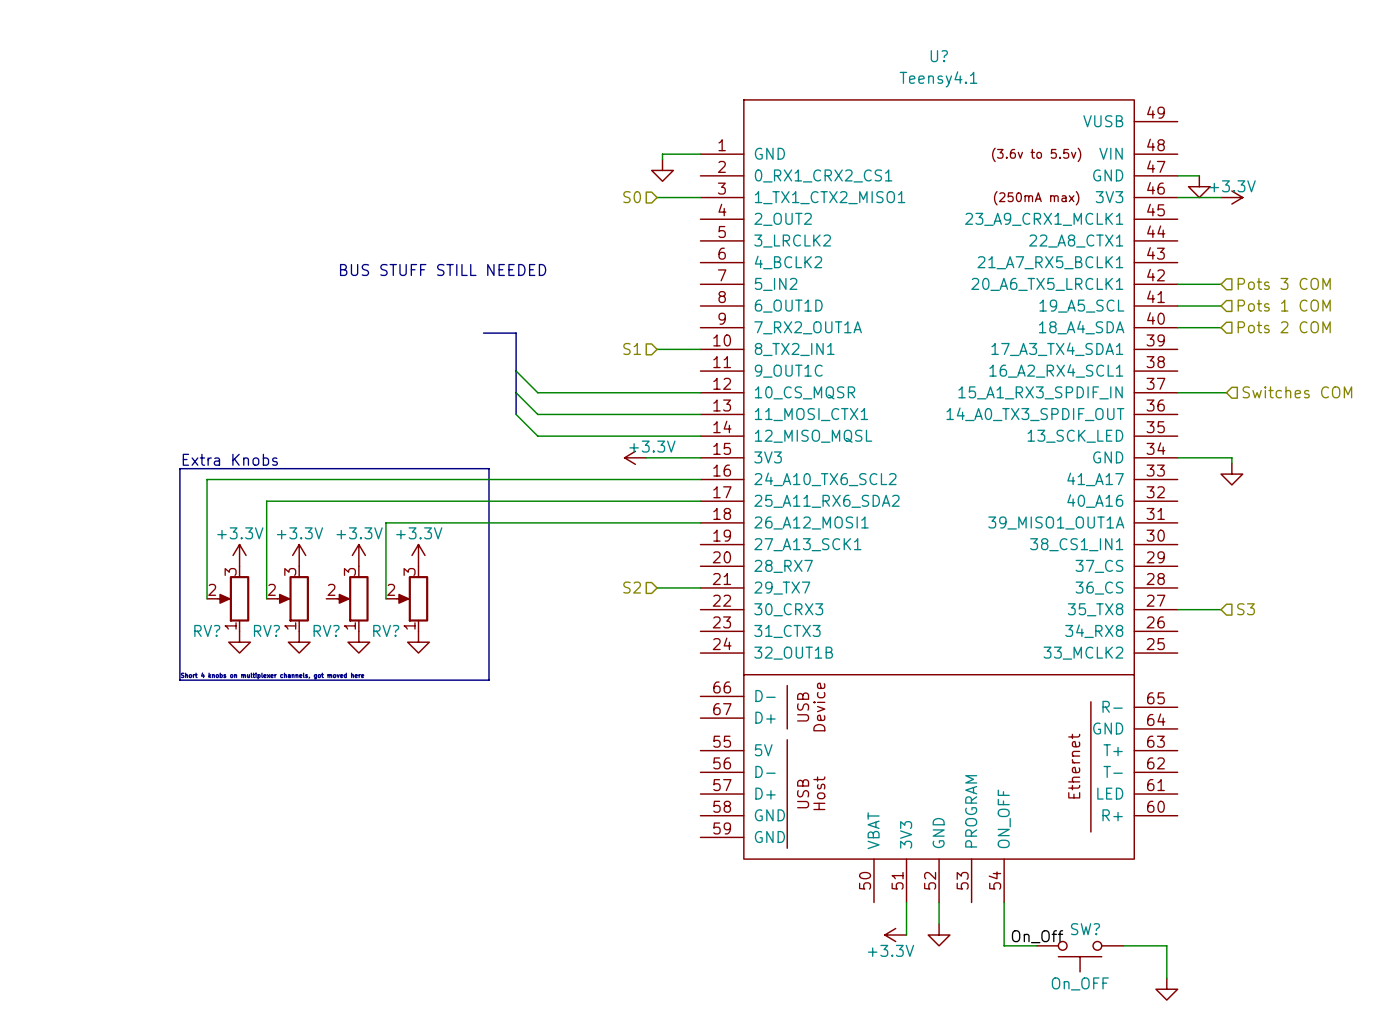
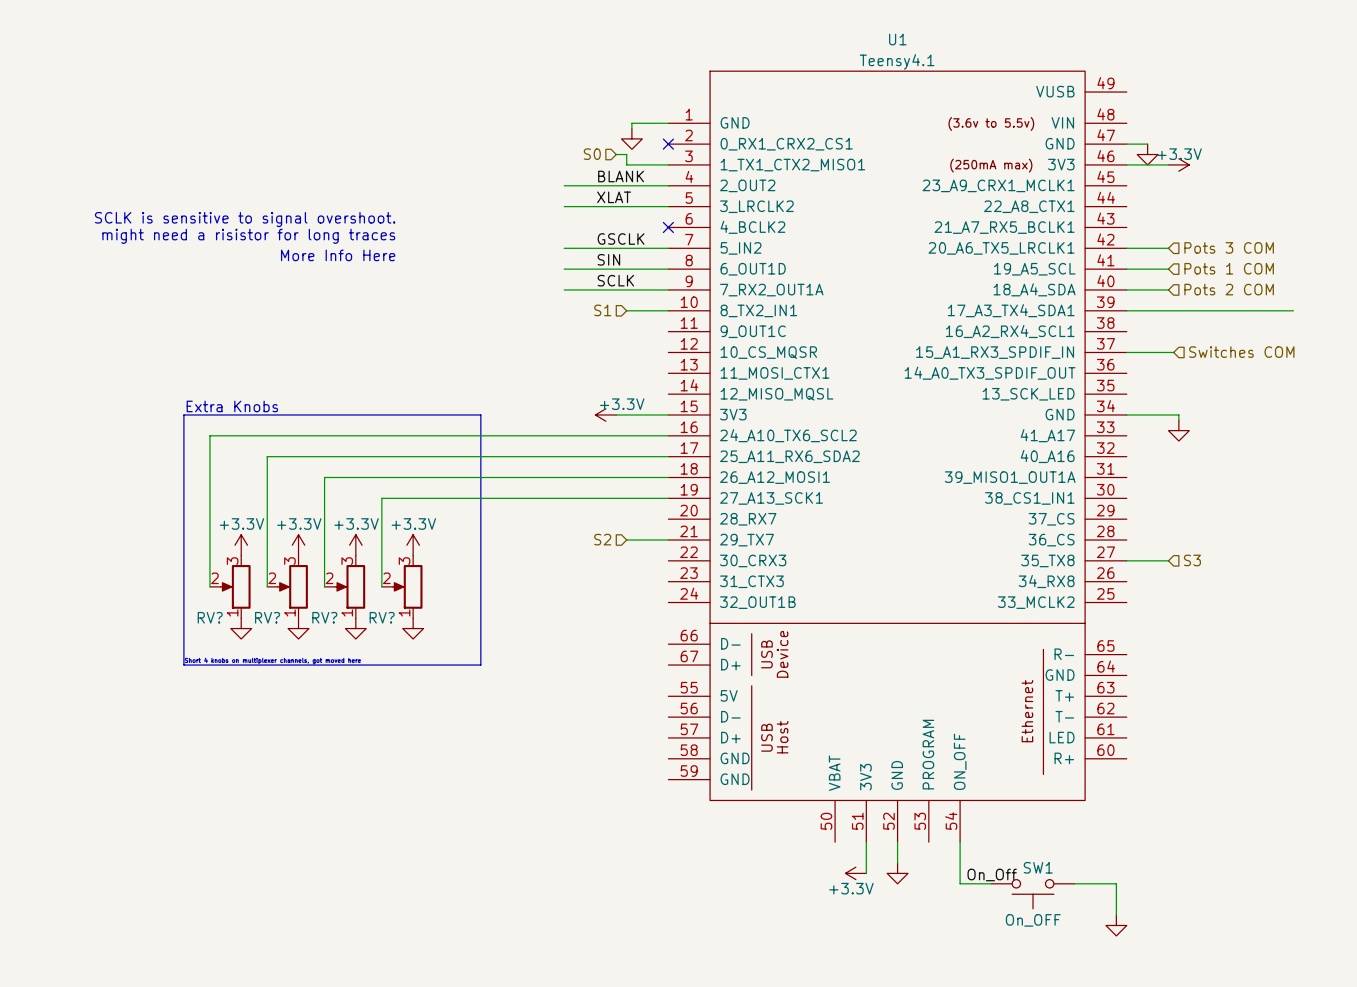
no-connect mark: none -> (668, 144)
wire: none -> (616, 154) (626, 154) (626, 164) (668, 164)
wire: (700, 154) (662, 154) (662, 159) -> (668, 123) (631, 123) (631, 128)
power symbol position: (662, 170) -> (631, 138)
label: none -> BLANK (621, 176)
wire: (1177, 175) (1199, 175) -> (1126, 144) (1147, 144)
wire: none -> (564, 185) (668, 185)
power symbol position: (1199, 186) -> (1147, 154)
label: none -> XLAT (614, 197)
hierarchical label position: S0 (632, 197) -> S0 (592, 154)
wire: (657, 197) (700, 197) -> none
wire: (1177, 197) (1221, 197) -> (1126, 164) (1168, 164)
power symbol position: +3.3V (1231, 197) -> +3.3V (1178, 164)
wire: none -> (564, 206) (668, 206)
text: none -> SCLK is sensitive to signal overshoot. (245, 219)
no-connect mark: none -> (668, 227)
text: none -> might need a risistor for long traces (248, 236)
label: none -> GSCLK (621, 239)
wire: none -> (564, 248) (668, 248)
text: none -> More Info Here (338, 255)
label: none -> SIN (608, 259)
wire: none -> (564, 269) (668, 269)
text: BUS STUFF STILL NEEDED (443, 270) -> none
label: none -> SCLK (615, 280)
hierarchical label position: Pots 3 COM (1284, 283) -> Pots 3 COM (1229, 247)
wire: (1177, 284) (1221, 284) -> (1126, 248) (1168, 248)
wire: none -> (564, 289) (668, 289)
wire: (1177, 305) (1221, 305) -> (1126, 269) (1168, 269)
hierarchical label position: Pots 1 COM (1284, 305) -> Pots 1 COM (1229, 268)
wire: none -> (1126, 310) (1293, 310)
wire: (1177, 327) (1221, 327) -> (1126, 289) (1168, 289)
hierarchical label position: Pots 2 COM (1284, 327) -> Pots 2 COM (1229, 289)
bus: (483, 333) (516, 333) (516, 414) -> none
hierarchical label position: S1 (632, 348) -> S1 (602, 310)
wire: (657, 349) (700, 349) -> (626, 310) (668, 310)
wire: (516, 371) (537, 392) (700, 392) -> none
wire: (516, 392) (537, 414) (700, 414) -> none
wire: (1177, 392) (1226, 392) -> (1126, 352) (1173, 352)
hierarchical label position: Switches COM (1297, 392) -> Switches COM (1241, 352)
wire: (516, 414) (537, 436) (700, 436) -> none
power symbol position: +3.3V (635, 457) -> +3.3V (605, 414)
wire: (646, 457) (700, 457) -> (616, 414) (668, 414)
wire: (1177, 457) (1231, 457) (1231, 463) -> (1126, 414) (1178, 414) (1178, 420)
text position: Extra Knobs (230, 459) -> Extra Knobs (232, 406)
U1: none -> Teensy4.1 (897, 456)
line: (179, 468) (488, 468) -> (183, 461) (183, 414) (480, 414) (480, 461)
power symbol position: (1231, 474) -> (1178, 430)
wire: (207, 479) (700, 479) -> (209, 472) (209, 435) (668, 435)
wire: none -> (668, 477) (324, 477) (324, 586)
wire: (266, 501) (700, 501) -> (267, 493) (267, 456) (668, 456)
U?: Teensy4.1 (939, 501) -> none
wire: (385, 522) (700, 522) -> (381, 513) (381, 498) (668, 498)
hierarchical label position: S2 (632, 587) -> S2 (602, 539)
wire: (657, 587) (700, 587) -> (626, 540) (668, 540)
wire: (1177, 609) (1221, 609) -> (1126, 560) (1168, 560)
hierarchical label position: S3 (1245, 609) -> S3 (1192, 560)
wire: (906, 902) (906, 935) -> (866, 842) (866, 873)
wire: (939, 902) (939, 924) -> (897, 842) (897, 862)
wire: (1004, 902) (1004, 945) (1036, 945) -> (960, 842) (960, 883) (991, 883)
SW1: none -> On_OFF (1033, 894)
power symbol position: +3.3V (895, 935) -> +3.3V (855, 873)
power symbol position: (939, 935) -> (897, 873)
label position: On_Off (1037, 936) -> On_Off (992, 875)
wire: (1123, 945) (1166, 945) (1166, 978) -> (1074, 883) (1116, 883) (1116, 915)
SW?: On_OFF (1080, 956) -> none
power symbol position: (1166, 989) -> (1116, 925)

